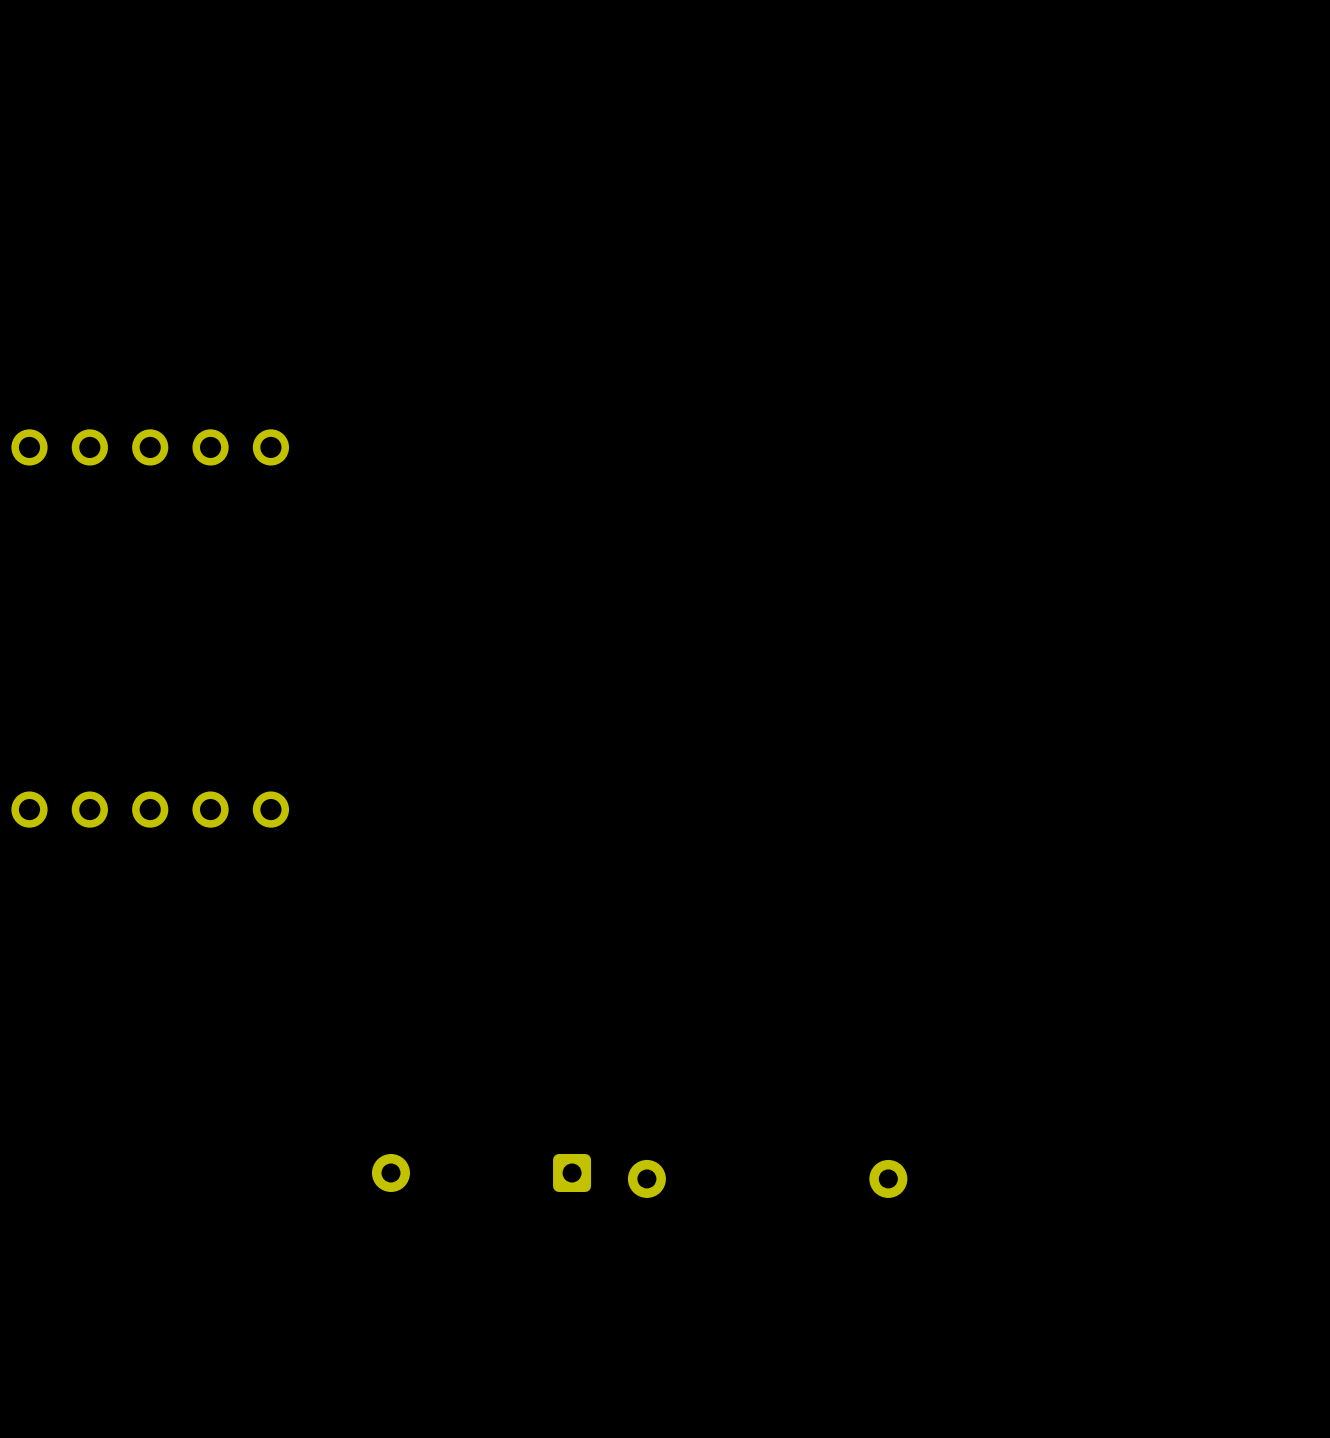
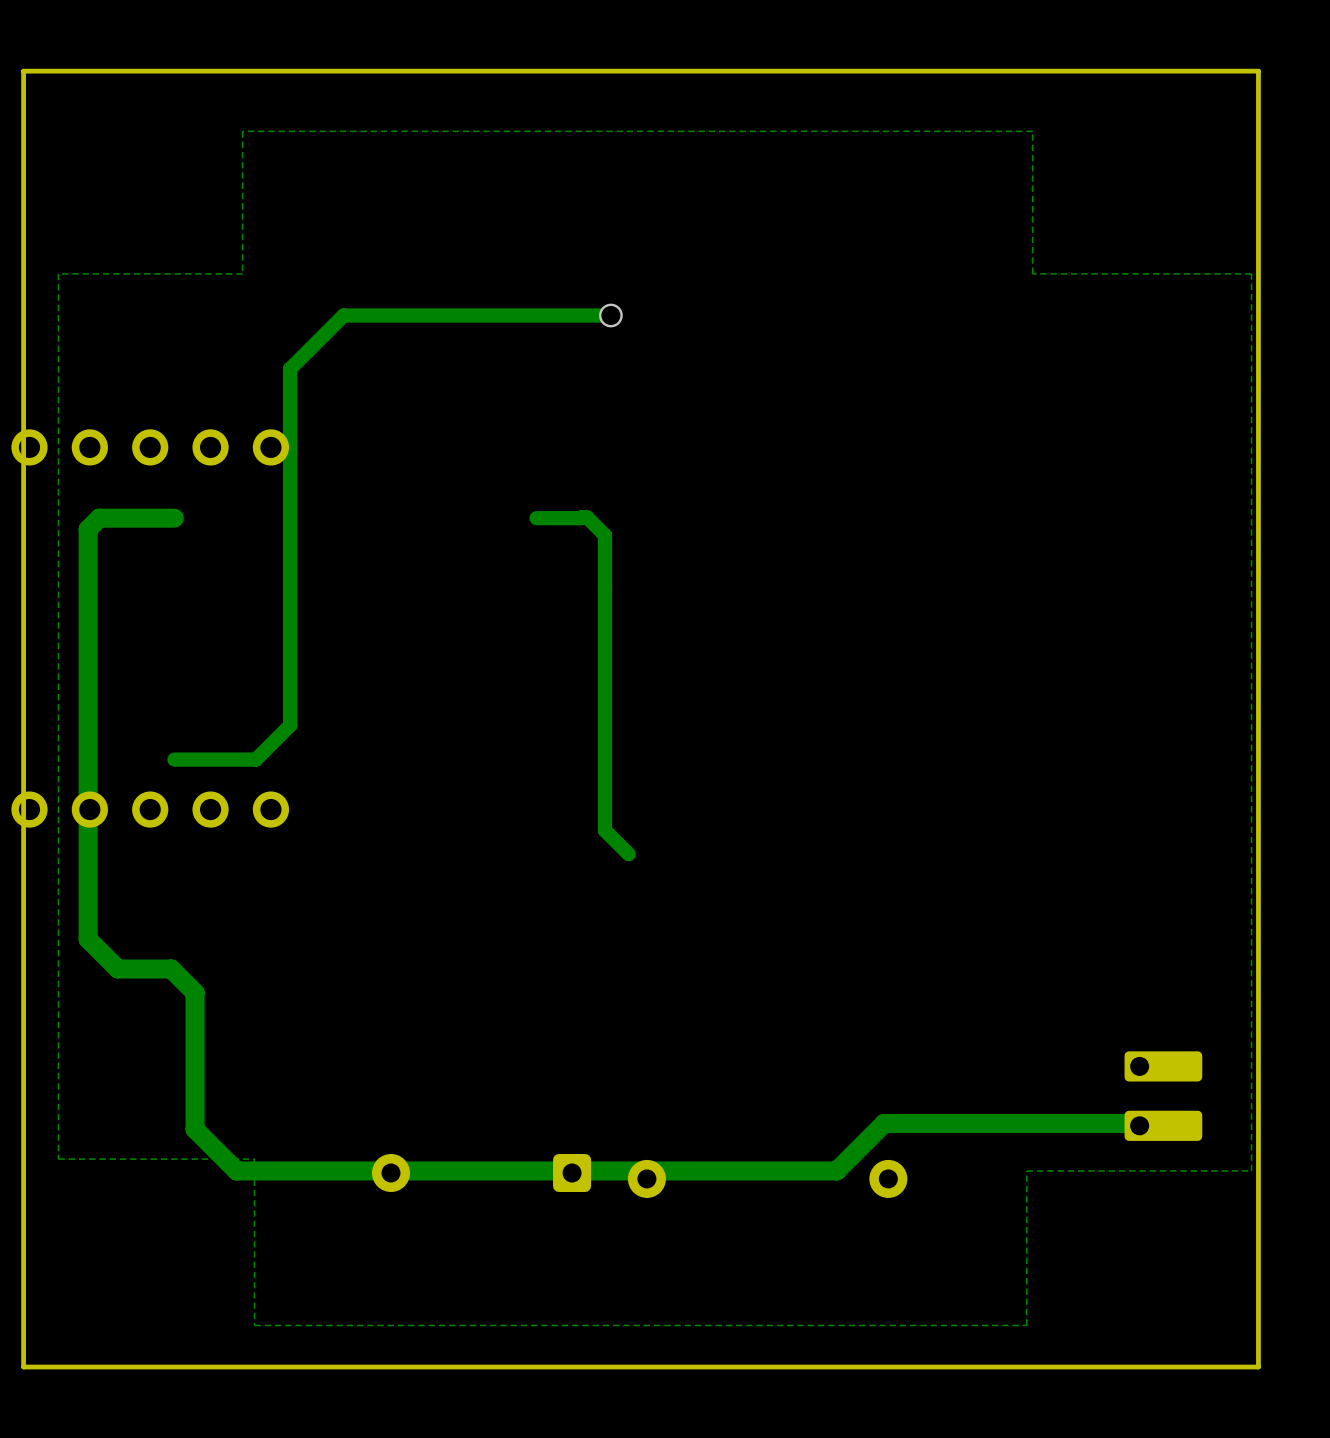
board edge: none -> (1258, 71) (23, 71) (23, 1367) (1258, 1367) (1258, 71)
zone outline: none -> (1032, 131) (242, 131) (242, 273) (58, 273) (58, 1159) (254, 1159) (254, 1325) (1026, 1325) (1026, 1170) (1251, 1170) (1251, 273) (1032, 273) (1032, 131)
track: none -> (610, 315) (343, 315) (290, 368) (290, 725) (255, 759) (174, 759)
via: none -> (610, 315)
track: none -> (174, 518) (99, 518) (88, 529) (88, 939) (117, 968) (171, 968) (195, 992) (195, 1129) (236, 1170) (836, 1170) (884, 1123) (1137, 1123) (1139, 1125)
track: none -> (536, 518) (587, 517) (604, 535) (604, 830) (628, 854)
part: none -> (1163, 1096)

